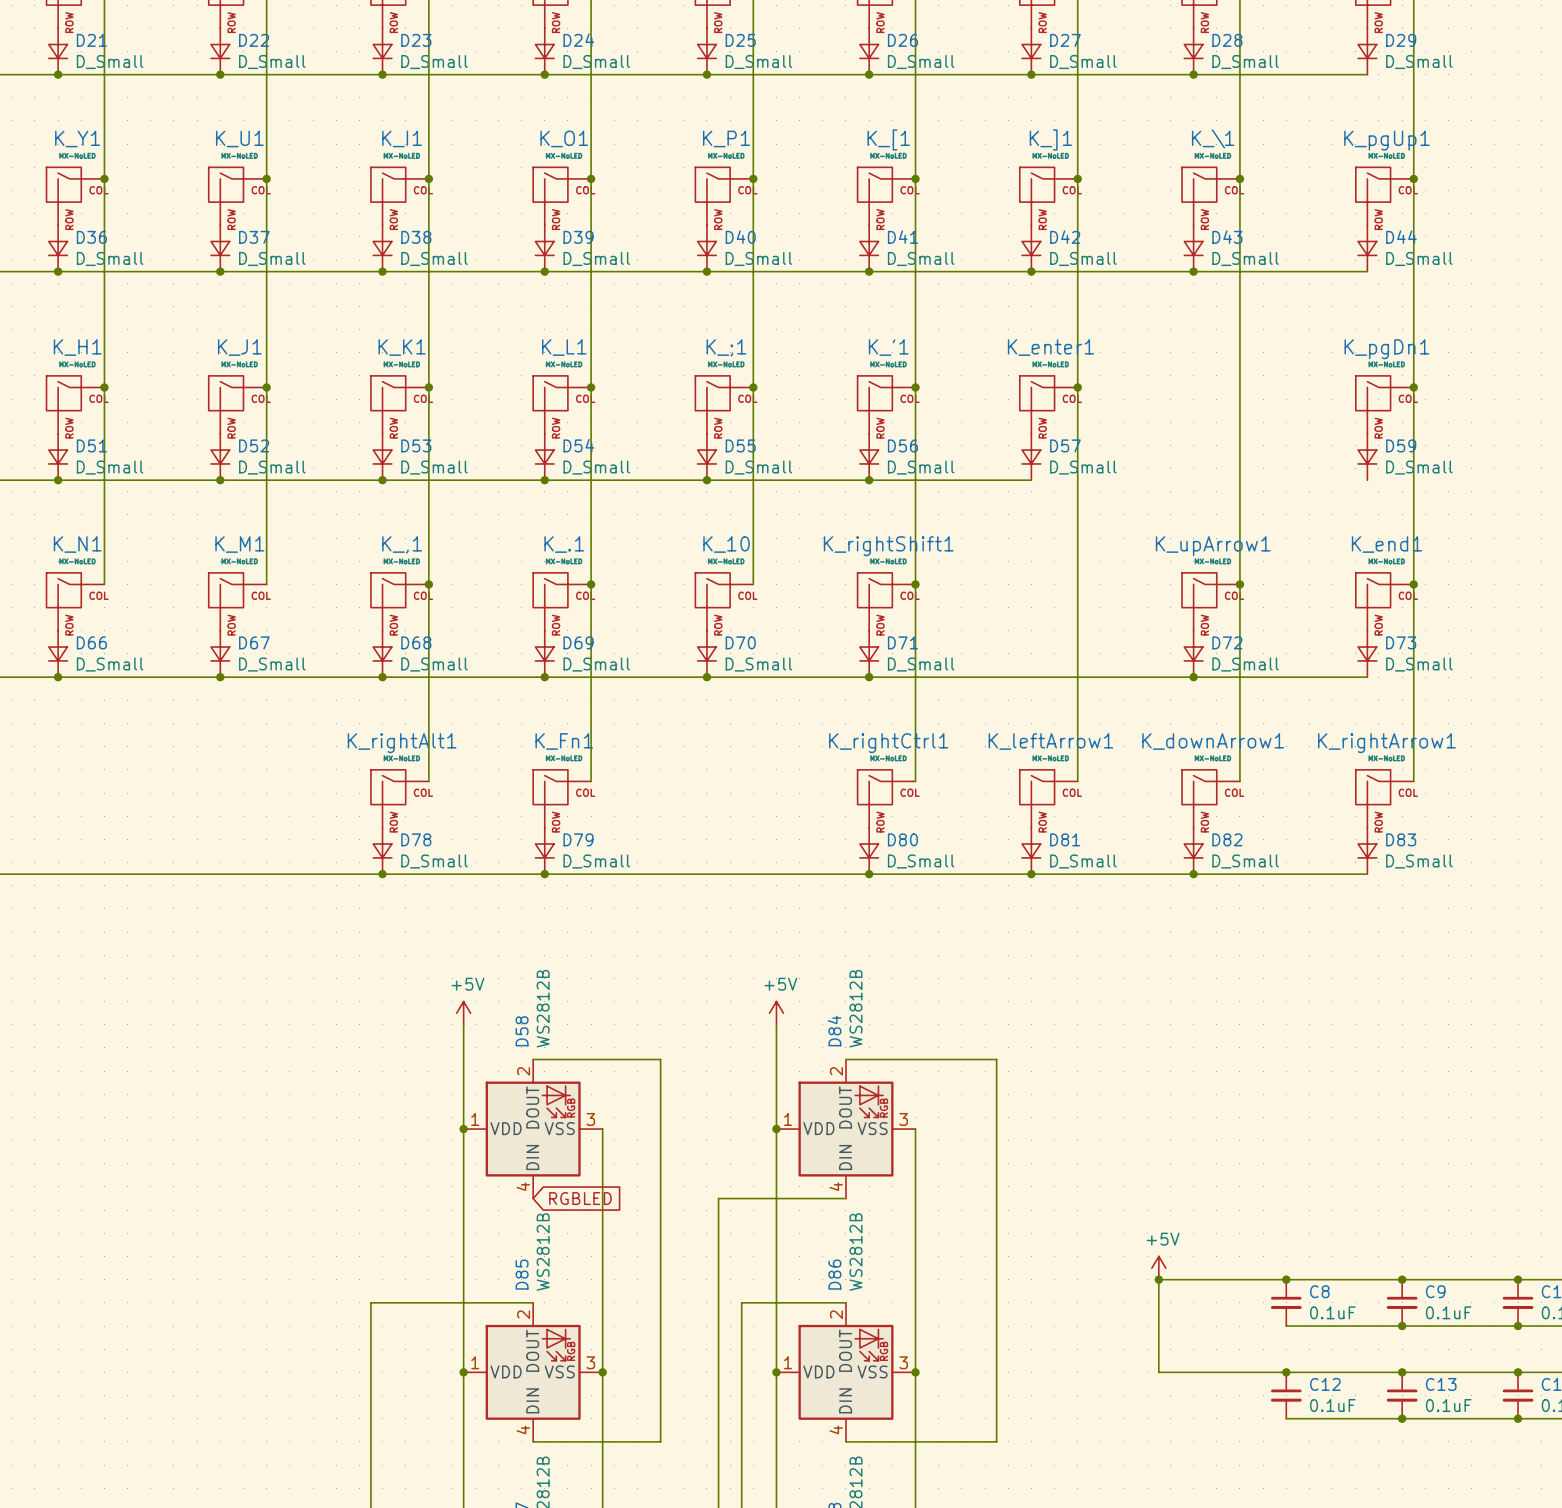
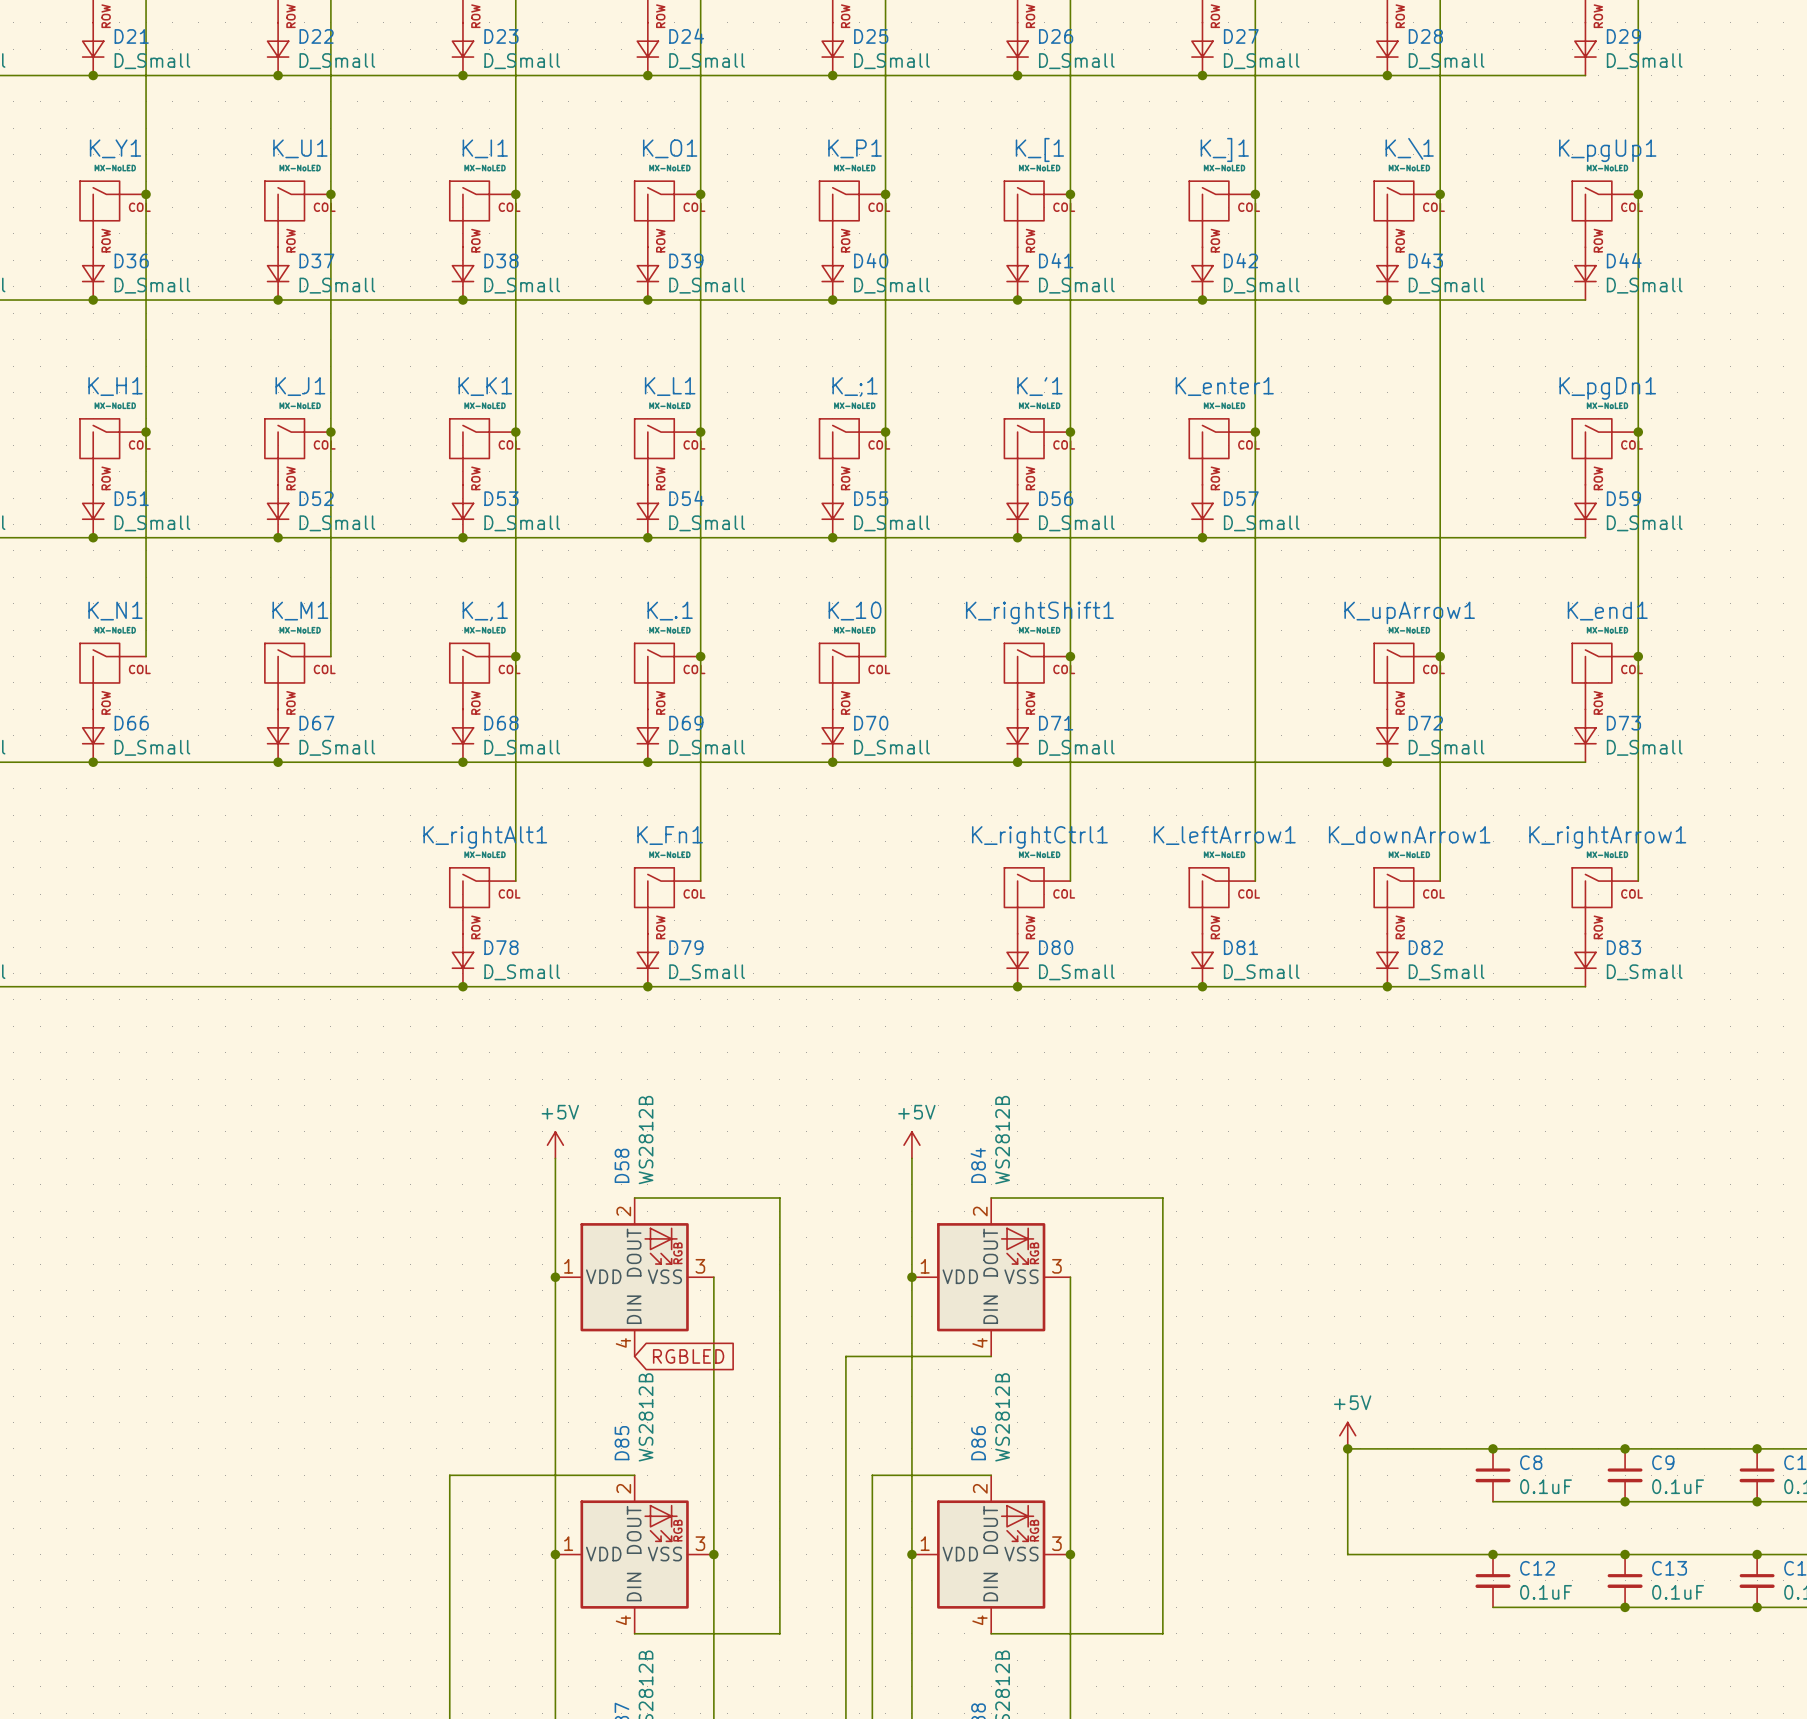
wire: none -> (1202, 537) (1585, 537)
junction: none -> (1202, 537)

